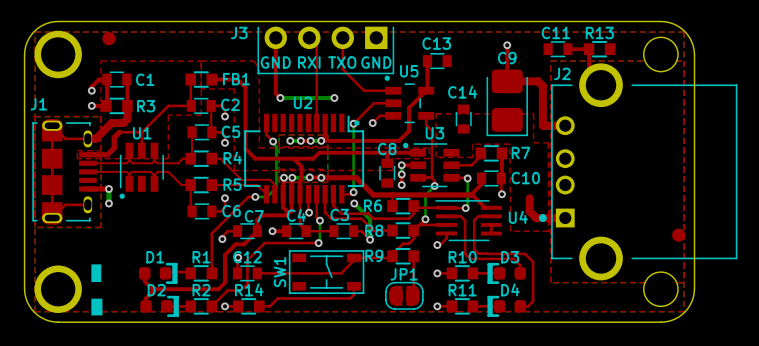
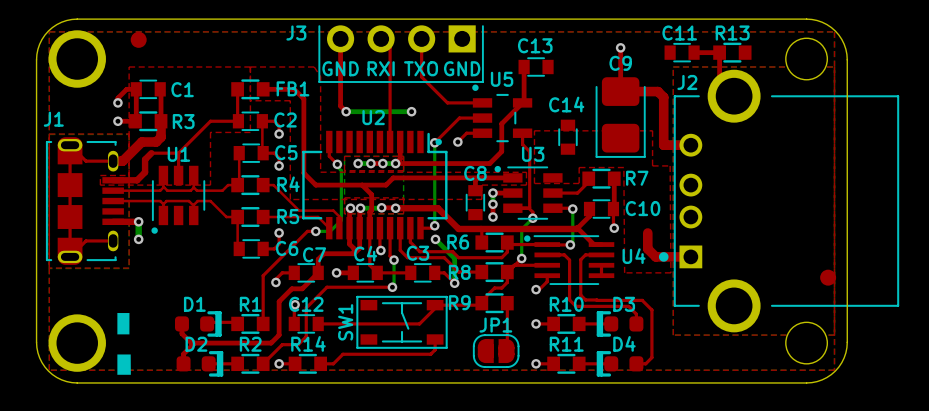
U4 footprint: [435, 200, 502, 242] -> [524, 235, 615, 286]

